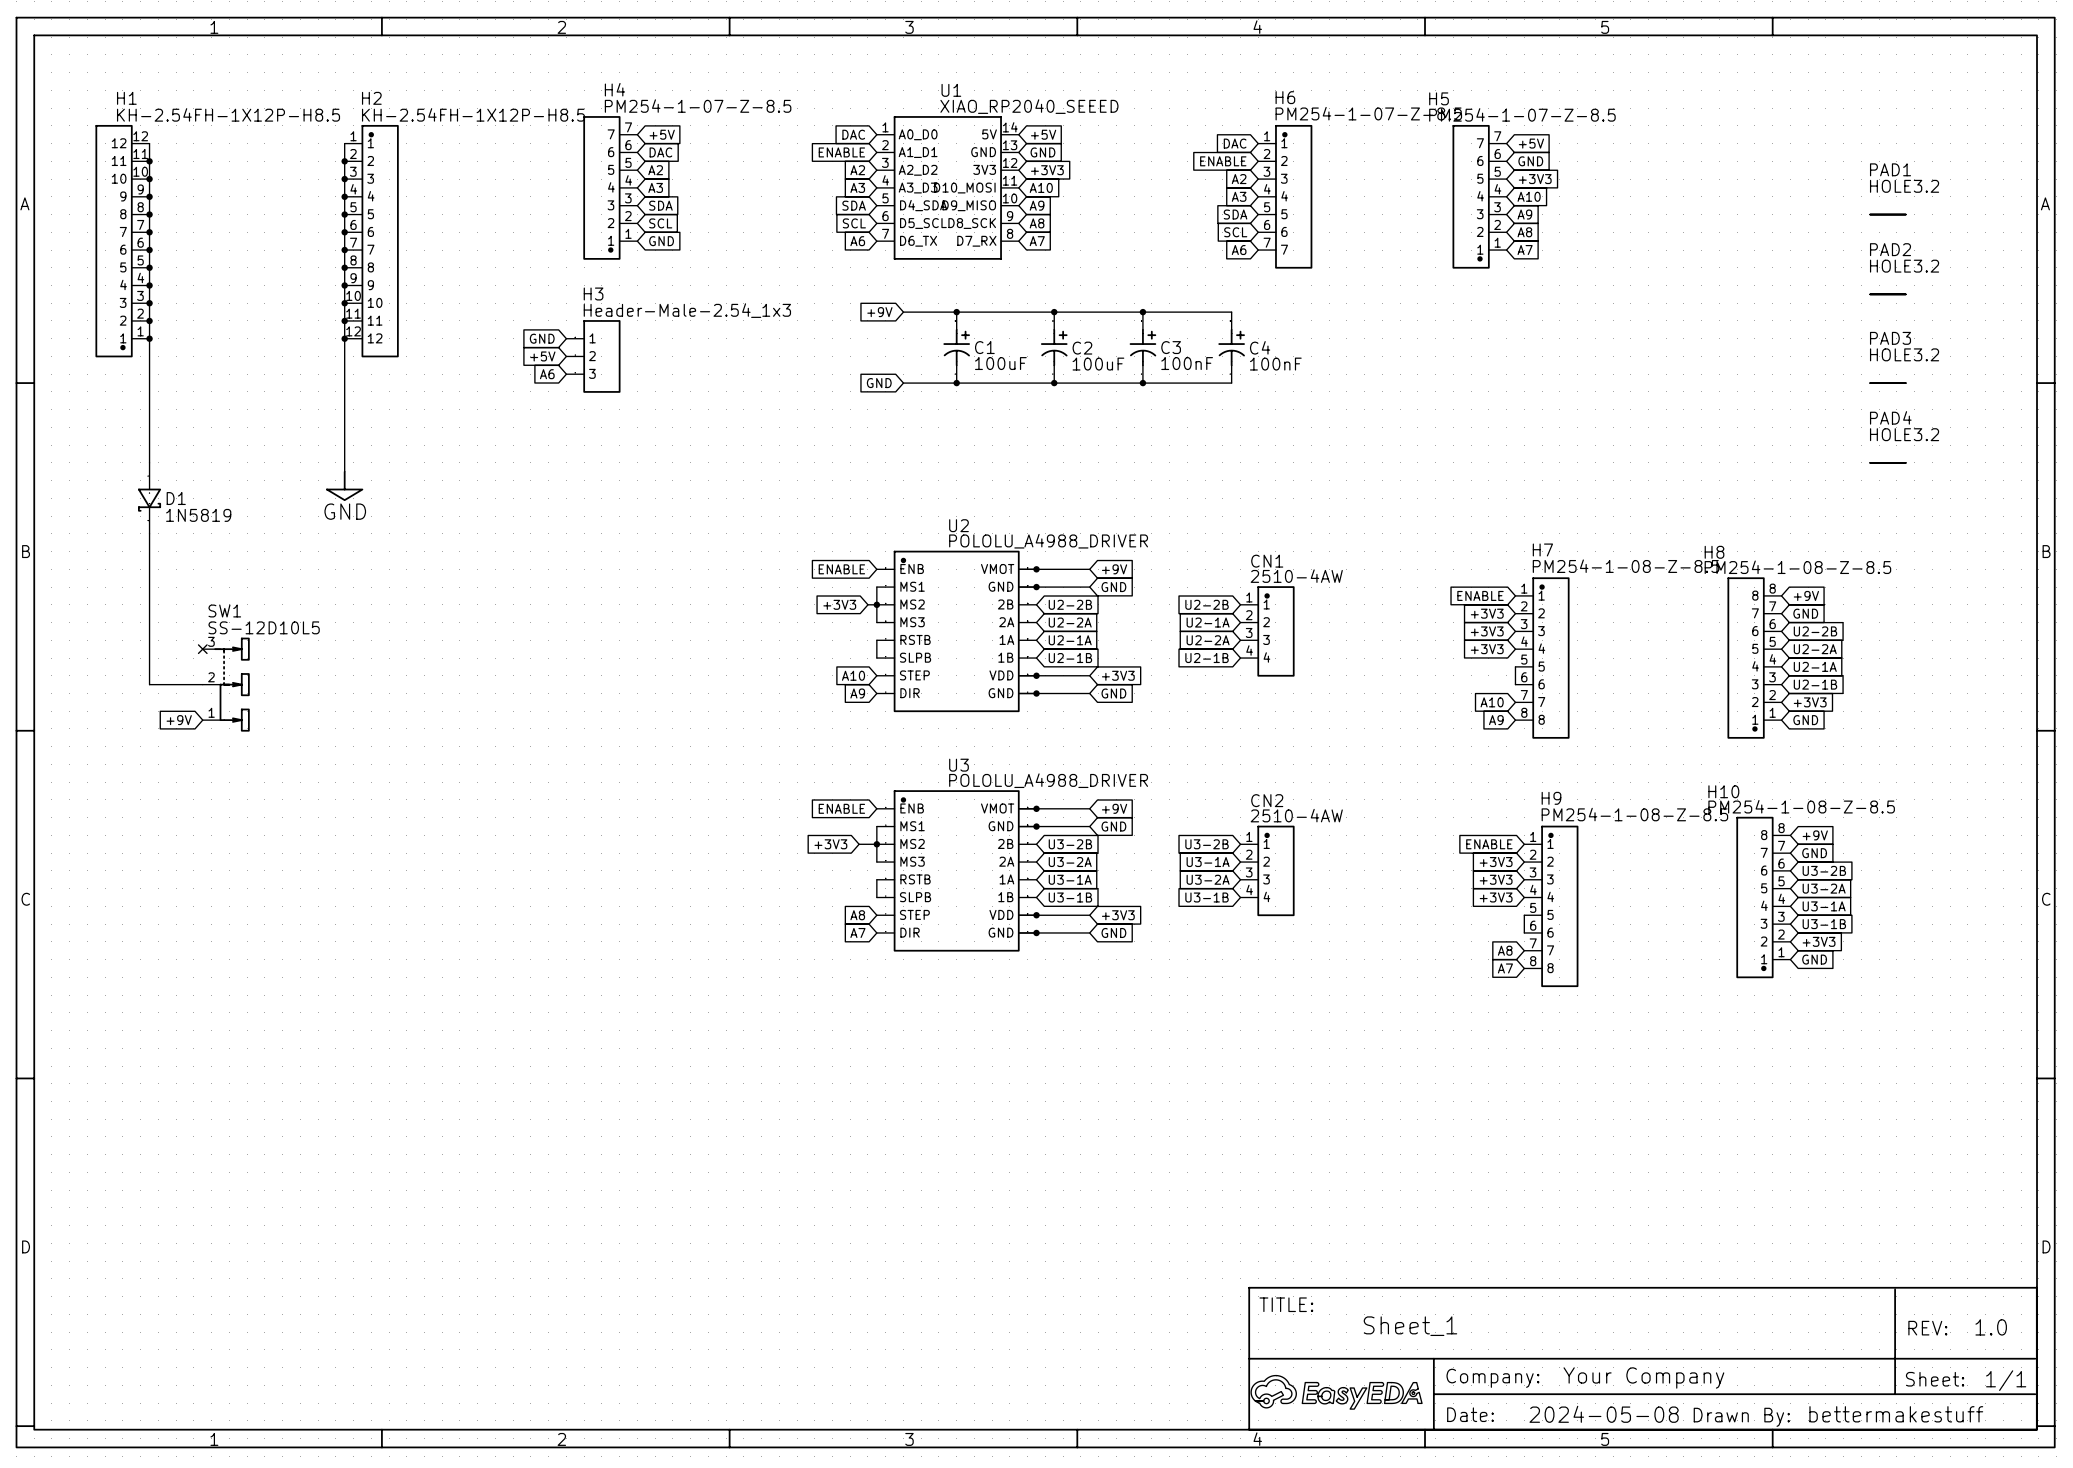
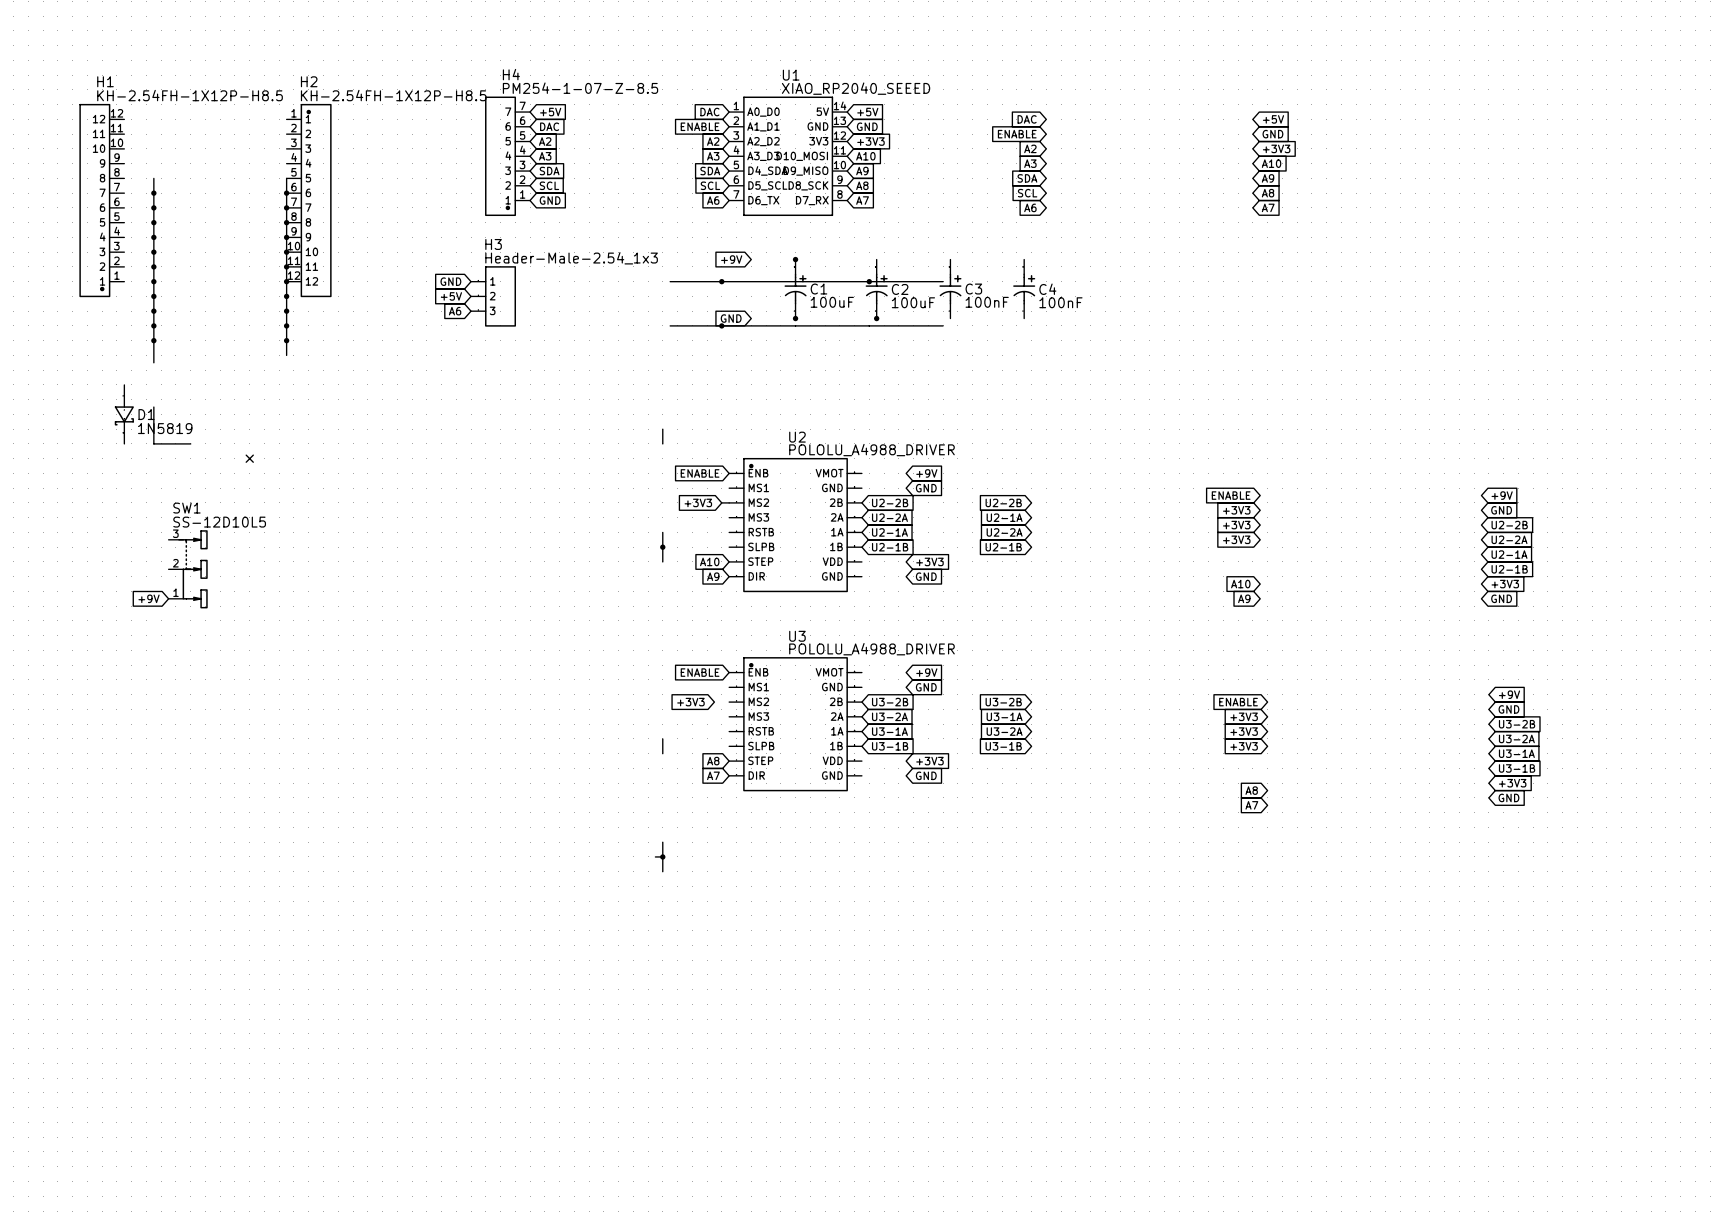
wire: (149, 143) (149, 462) -> none
wire: (344, 143) (344, 214) -> none
junction: (149, 161) -> none
junction: (344, 161) -> none
junction: (149, 179) -> none
junction: (344, 179) -> none
junction: (149, 196) -> none
junction: (344, 196) -> none
H6: PM254-1-07-Z-8.5 (1285, 196) -> none
H5: PM254-1-07-Z-8.5 (1479, 196) -> none
junction: (149, 214) -> none
wire: none -> (153, 178) (153, 362)
junction: (344, 214) -> none
PAD1: HOLE3.2 (1887, 214) -> none
junction: (149, 232) -> none
junction: none -> (153, 193)
junction: (149, 250) -> none
junction: none -> (153, 207)
junction: (149, 267) -> none
junction: none -> (153, 222)
junction: (149, 285) -> none
junction: none -> (153, 237)
PAD2: HOLE3.2 (1887, 294) -> none
junction: (149, 303) -> none
junction: none -> (153, 252)
wire: (903, 312) (1231, 312) -> (670, 281) (943, 281)
junction position: (1054, 312) -> (869, 281)
junction: (1142, 312) -> none
junction: (149, 320) -> none
junction: none -> (153, 266)
junction: (149, 338) -> none
junction: none -> (153, 281)
junction: none -> (721, 281)
junction: none -> (153, 296)
junction: none -> (286, 296)
junction: none -> (153, 311)
junction: none -> (286, 311)
wire: (903, 383) (1231, 383) -> (670, 325) (943, 325)
junction: (1142, 383) -> none
PAD3: HOLE3.2 (1887, 383) -> none
junction: none -> (153, 325)
junction: none -> (286, 325)
junction: none -> (721, 325)
junction: none -> (153, 340)
junction: none -> (286, 340)
wire: (344, 427) (344, 471) -> none
PAD4: HOLE3.2 (1887, 462) -> none
power symbol: GND (344, 485) -> none
wire: none -> (153, 407) (153, 443) (190, 443)
wire: (149, 533) (149, 684) (202, 684) -> none
no-connect mark: none -> (249, 458)
wire: (1018, 569) (1089, 569) -> none
junction: (1036, 569) -> none
wire: (876, 587) (876, 622) -> (662, 532) (662, 561)
wire: (1018, 587) (1089, 587) -> none
junction: (1036, 587) -> none
junction: (876, 604) -> none
CN1: 2510-4AW (1267, 631) -> none
wire: (876, 640) (876, 658) -> (662, 429) (662, 443)
no-connect mark: (202, 649) -> none
junction: none -> (662, 547)
H7: PM254-1-08-Z-8.5 (1542, 658) -> none
H8: PM254-1-08-Z-8.5 (1754, 658) -> none
wire: (1515, 666) (1515, 684) -> none
wire: (1018, 675) (1089, 675) -> none
junction: (1036, 675) -> none
wire: (1018, 693) (1089, 693) -> none
junction: (1036, 693) -> none
part: (1035, 732) -> none
wire: (1018, 808) (1089, 808) -> none
junction: (1036, 808) -> none
wire: (876, 826) (876, 862) -> none
wire: (1018, 826) (1089, 826) -> none
junction: (1036, 826) -> none
wire: (859, 844) (876, 844) -> none
junction: (876, 844) -> none
CN2: 2510-4AW (1267, 870) -> none
wire: (876, 879) (876, 897) -> (662, 738) (662, 753)
H10: PM254-1-08-Z-8.5 (1763, 897) -> none
H9: PM254-1-08-Z-8.5 (1551, 906) -> none
wire: (1018, 915) (1089, 915) -> none
junction: (1036, 915) -> none
wire: (1524, 915) (1524, 932) -> none
wire: (1018, 932) (1089, 932) -> none
junction: (1036, 932) -> none
wire: none -> (662, 842) (662, 871)
wire: none -> (655, 856) (662, 856)
junction: none -> (662, 856)

